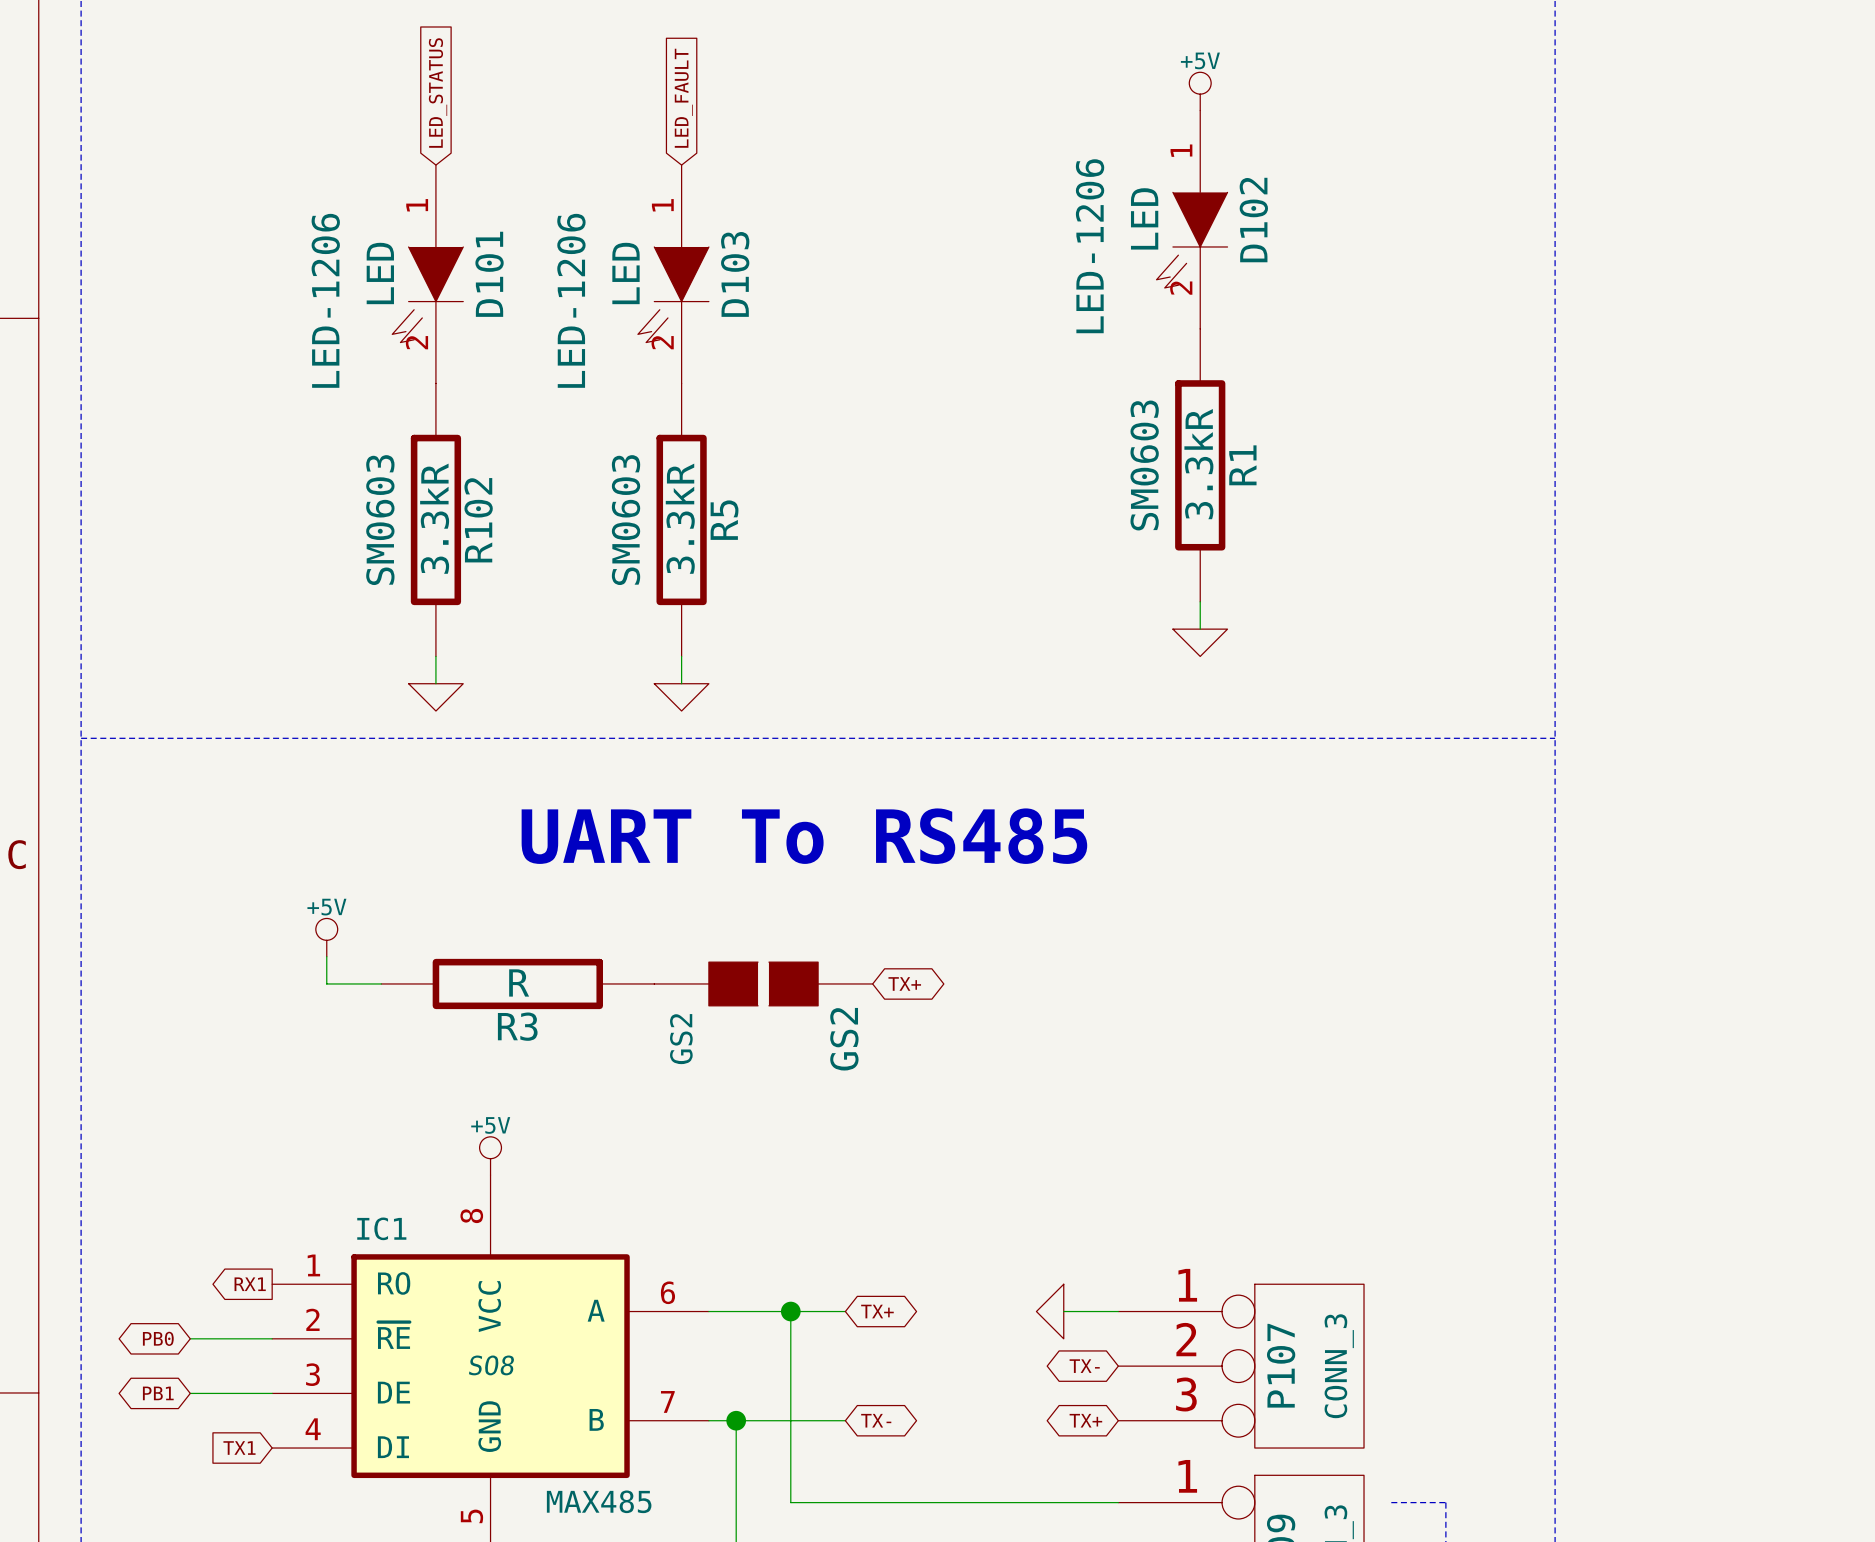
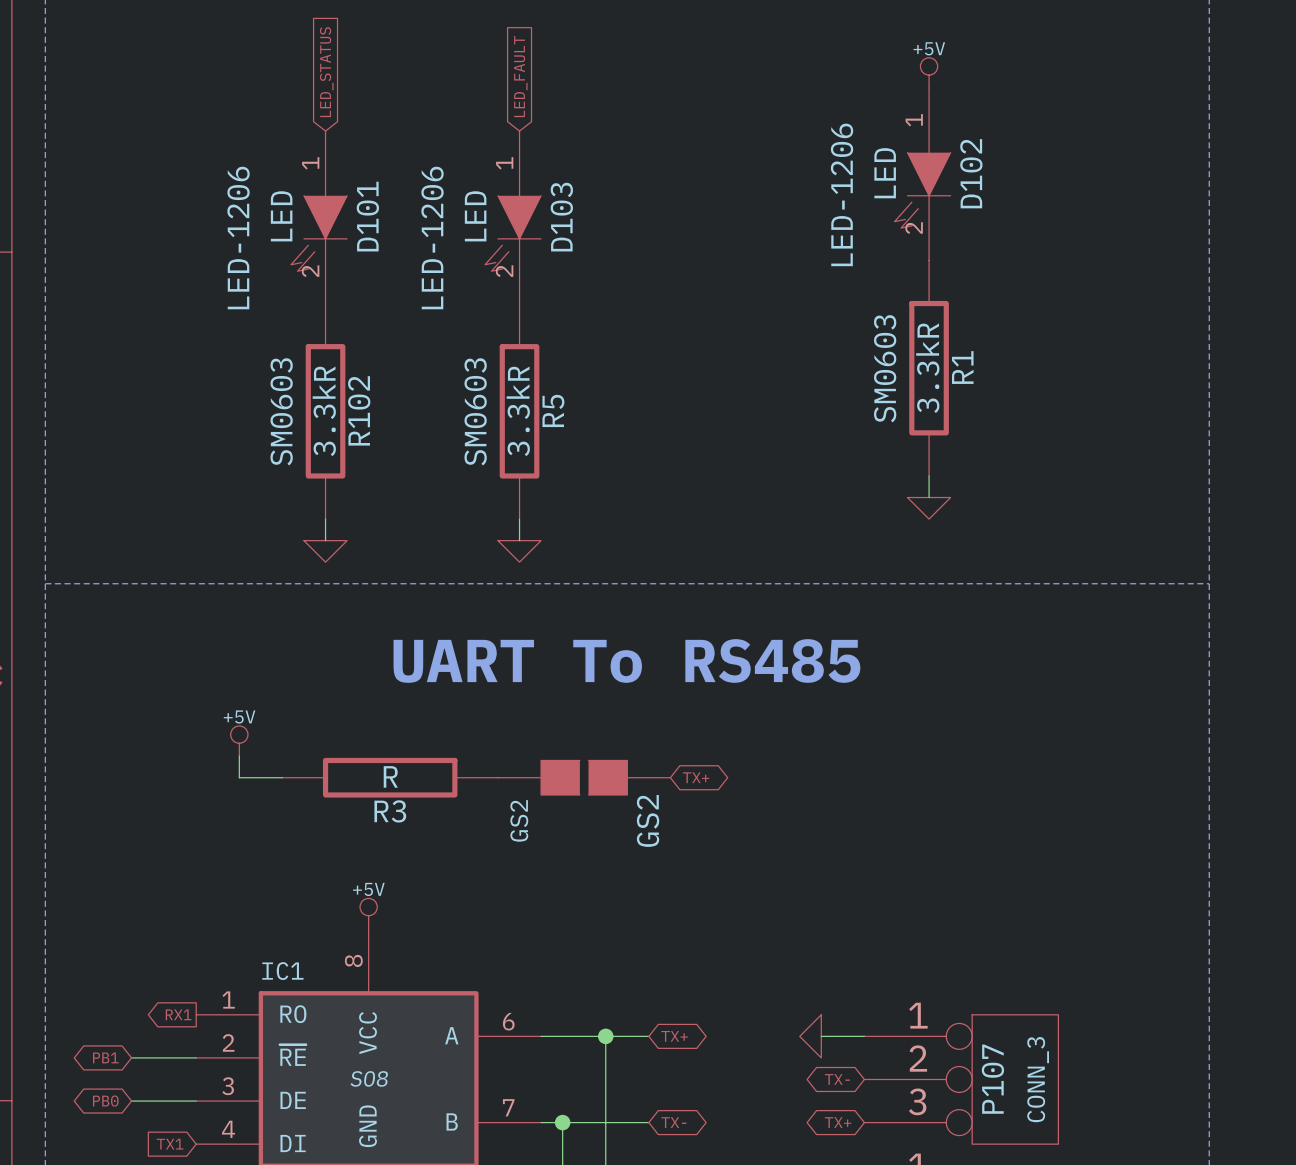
global label: PB0 (158, 1338) -> PB1 (105, 1057)
global label: PB1 (158, 1393) -> PB0 (105, 1101)

